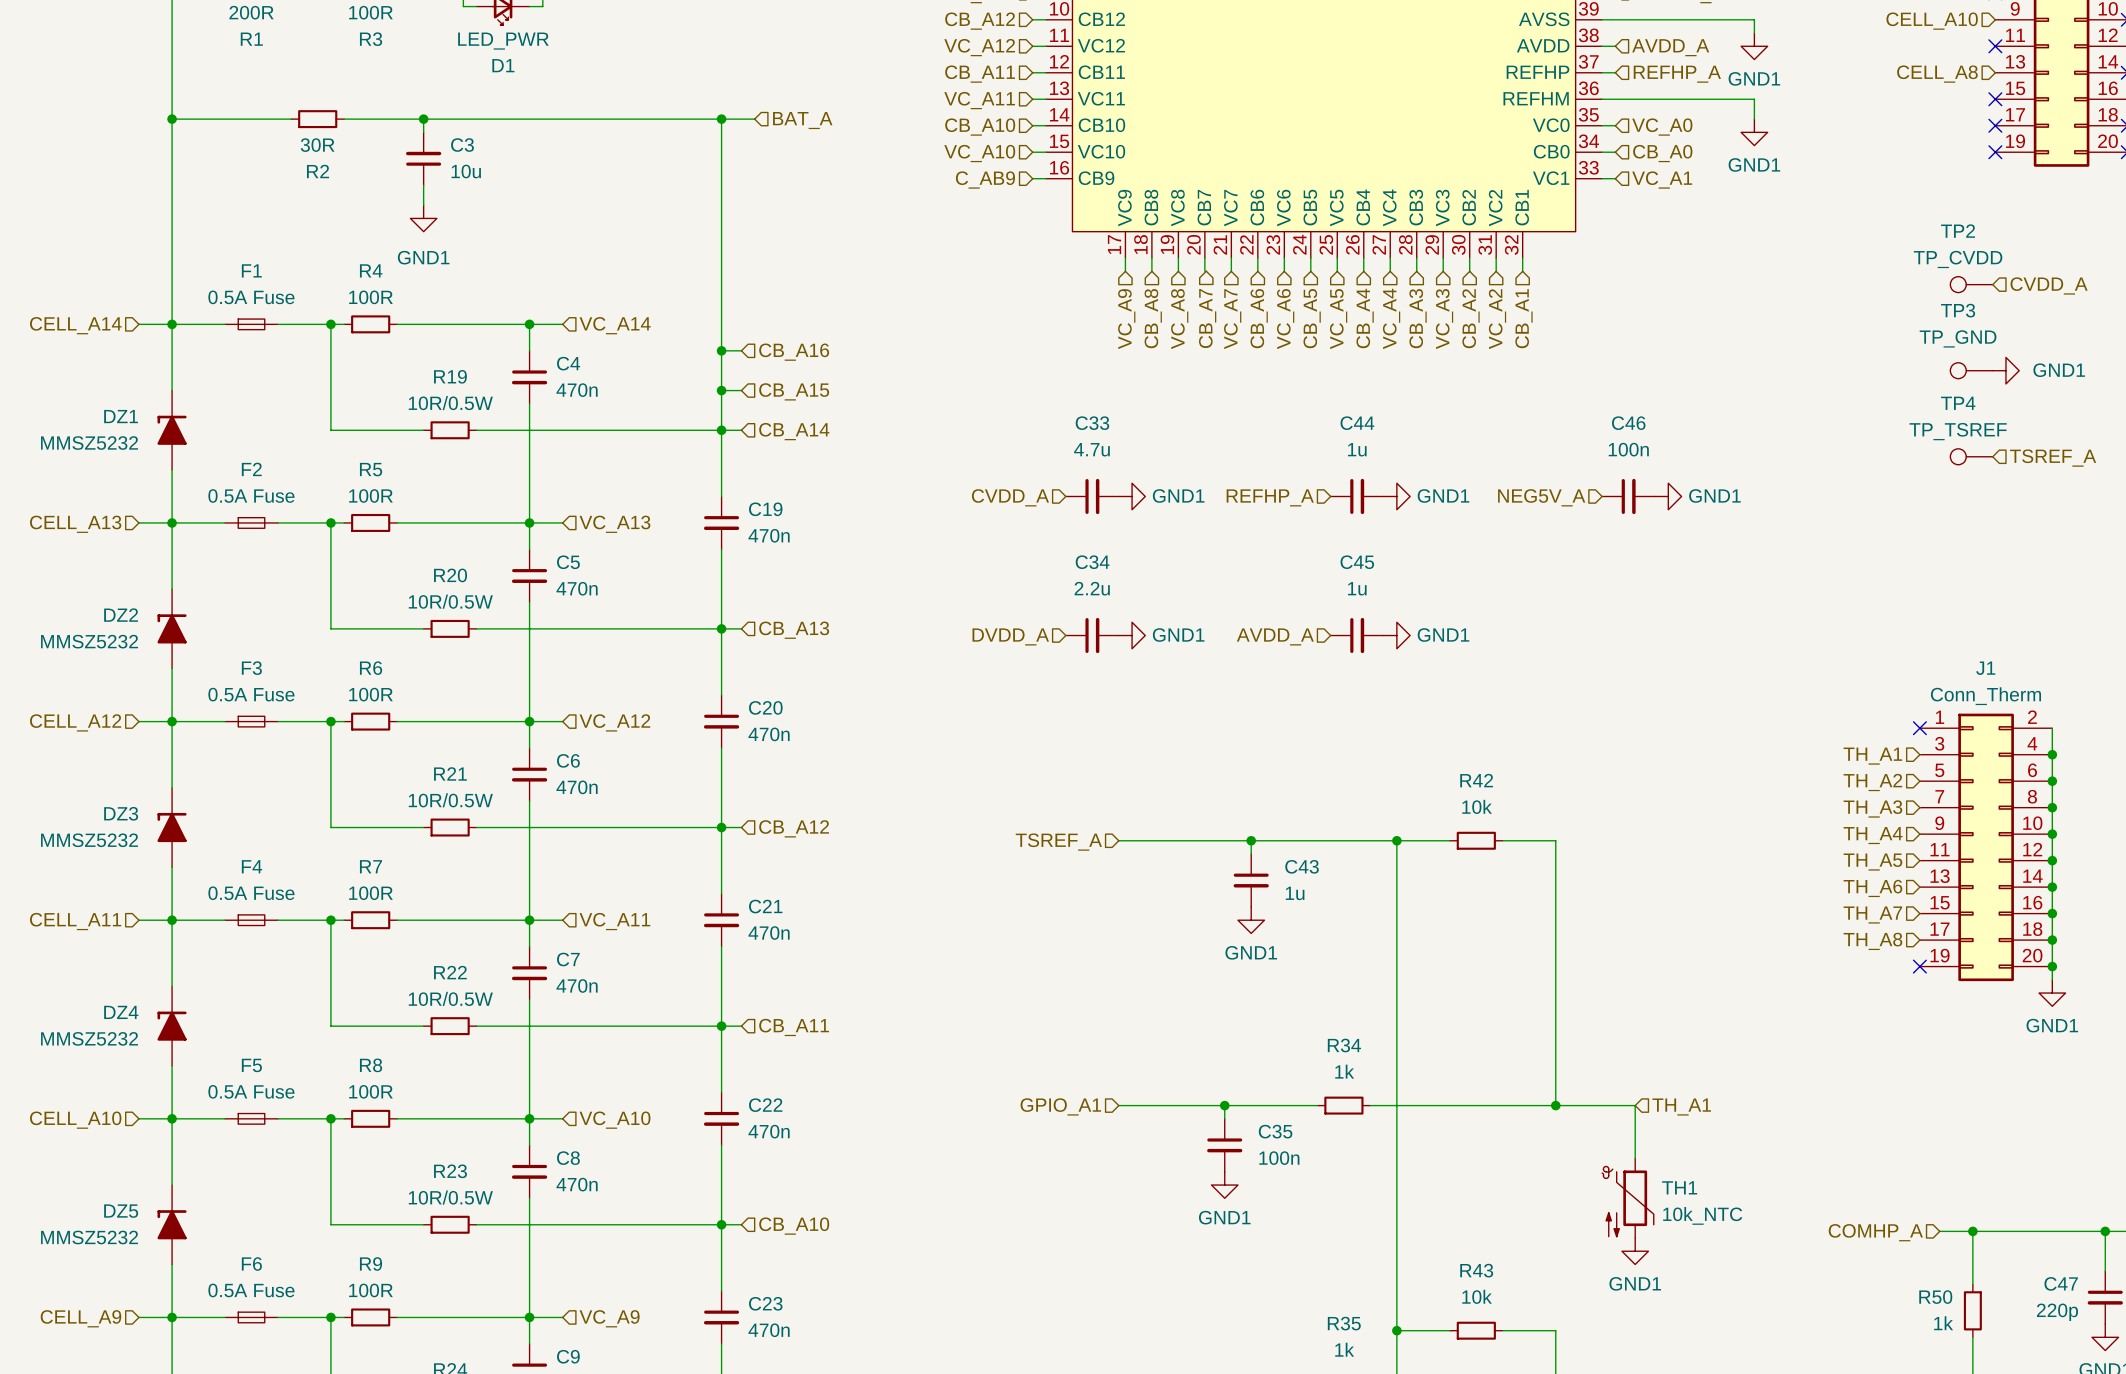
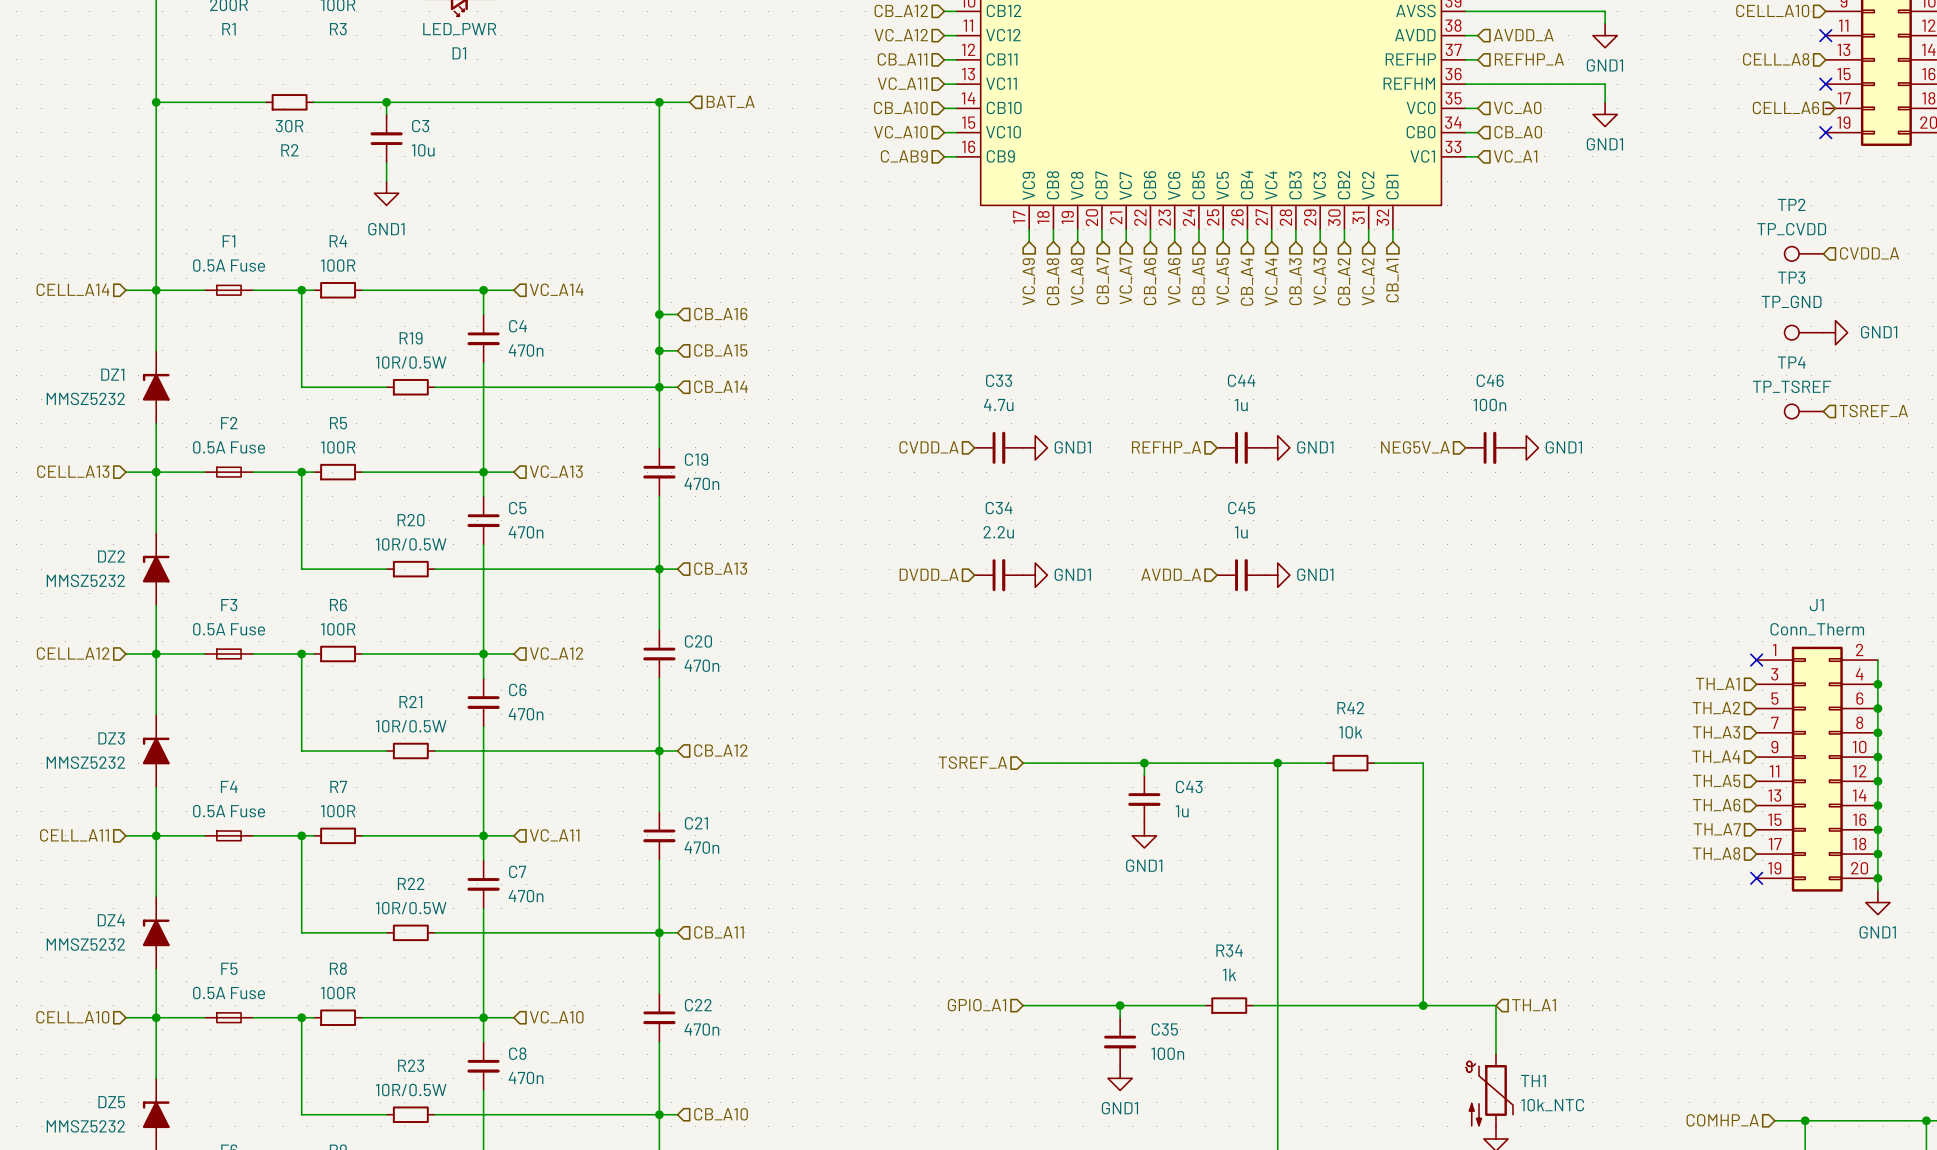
no-connect mark: (1995, 125) -> none
hierarchical label: none -> CELL_A6 (1786, 107)

